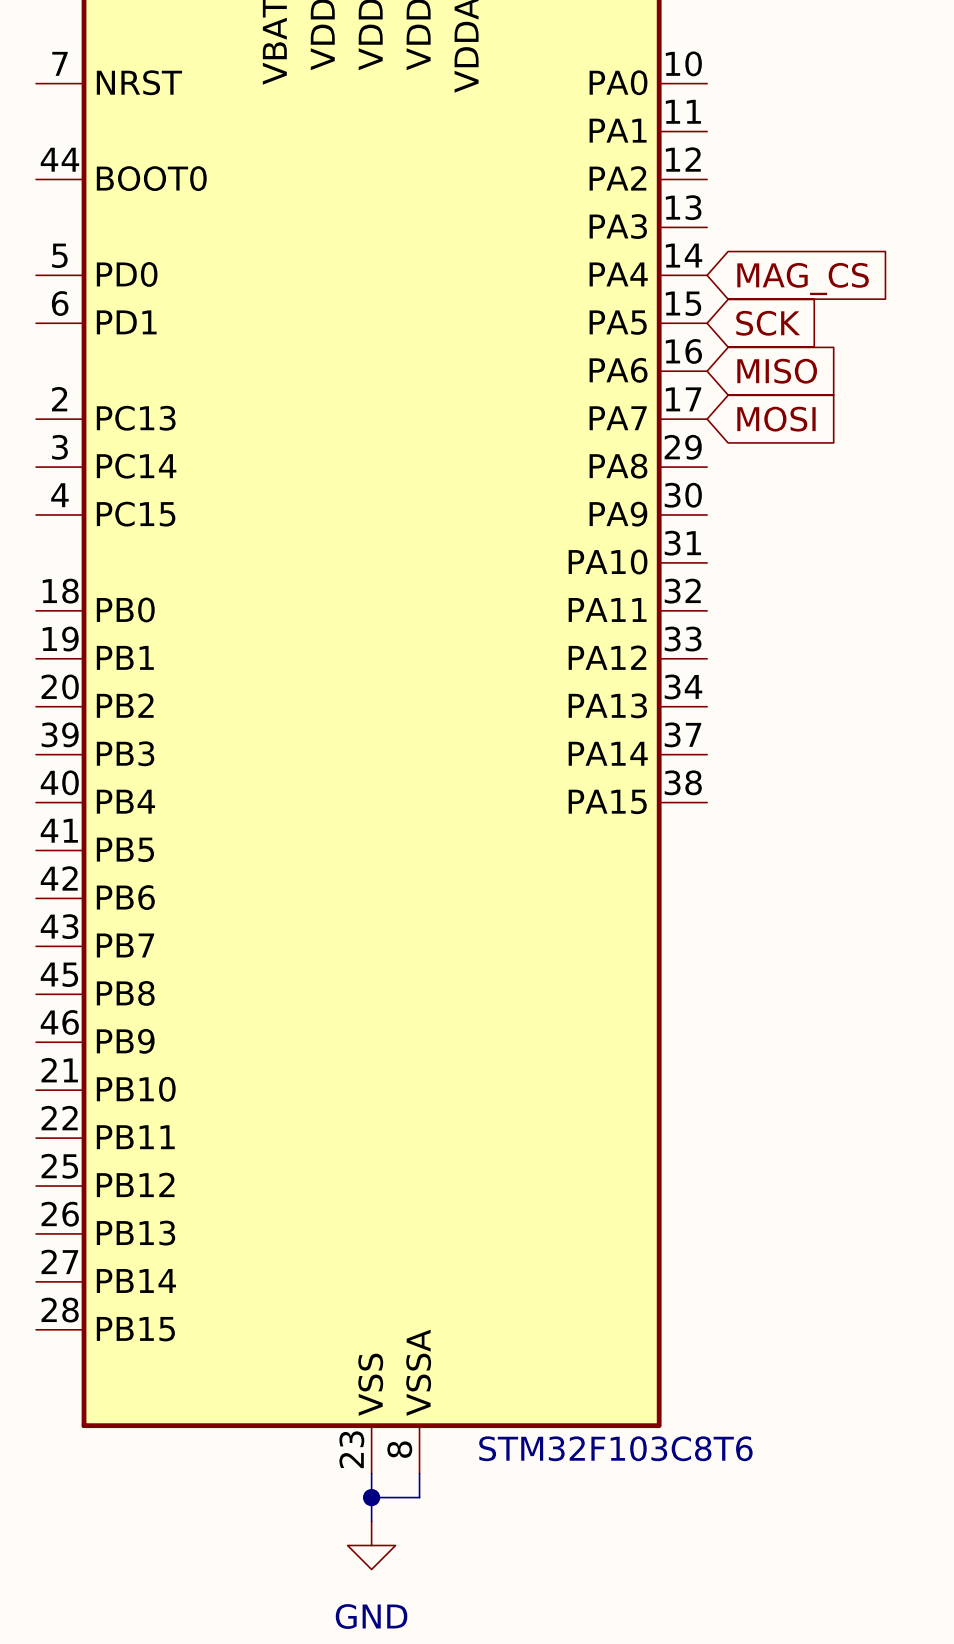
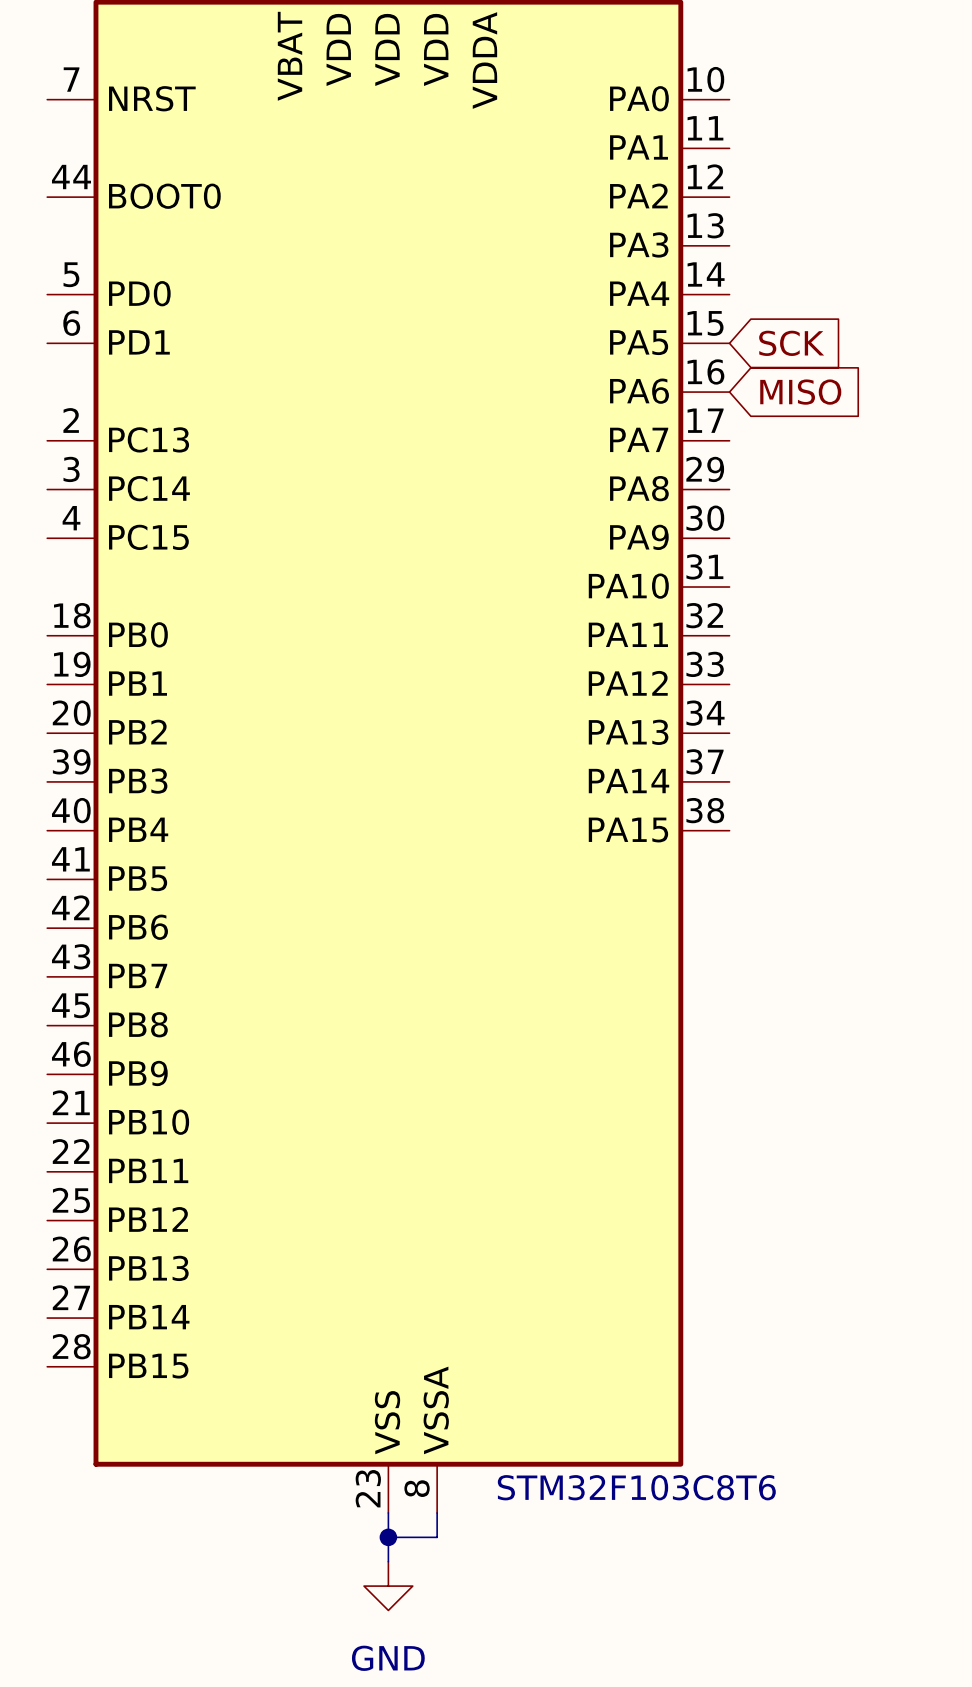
global label: MAG_CS (803, 279) -> none
global label: MOSI (776, 419) -> none

